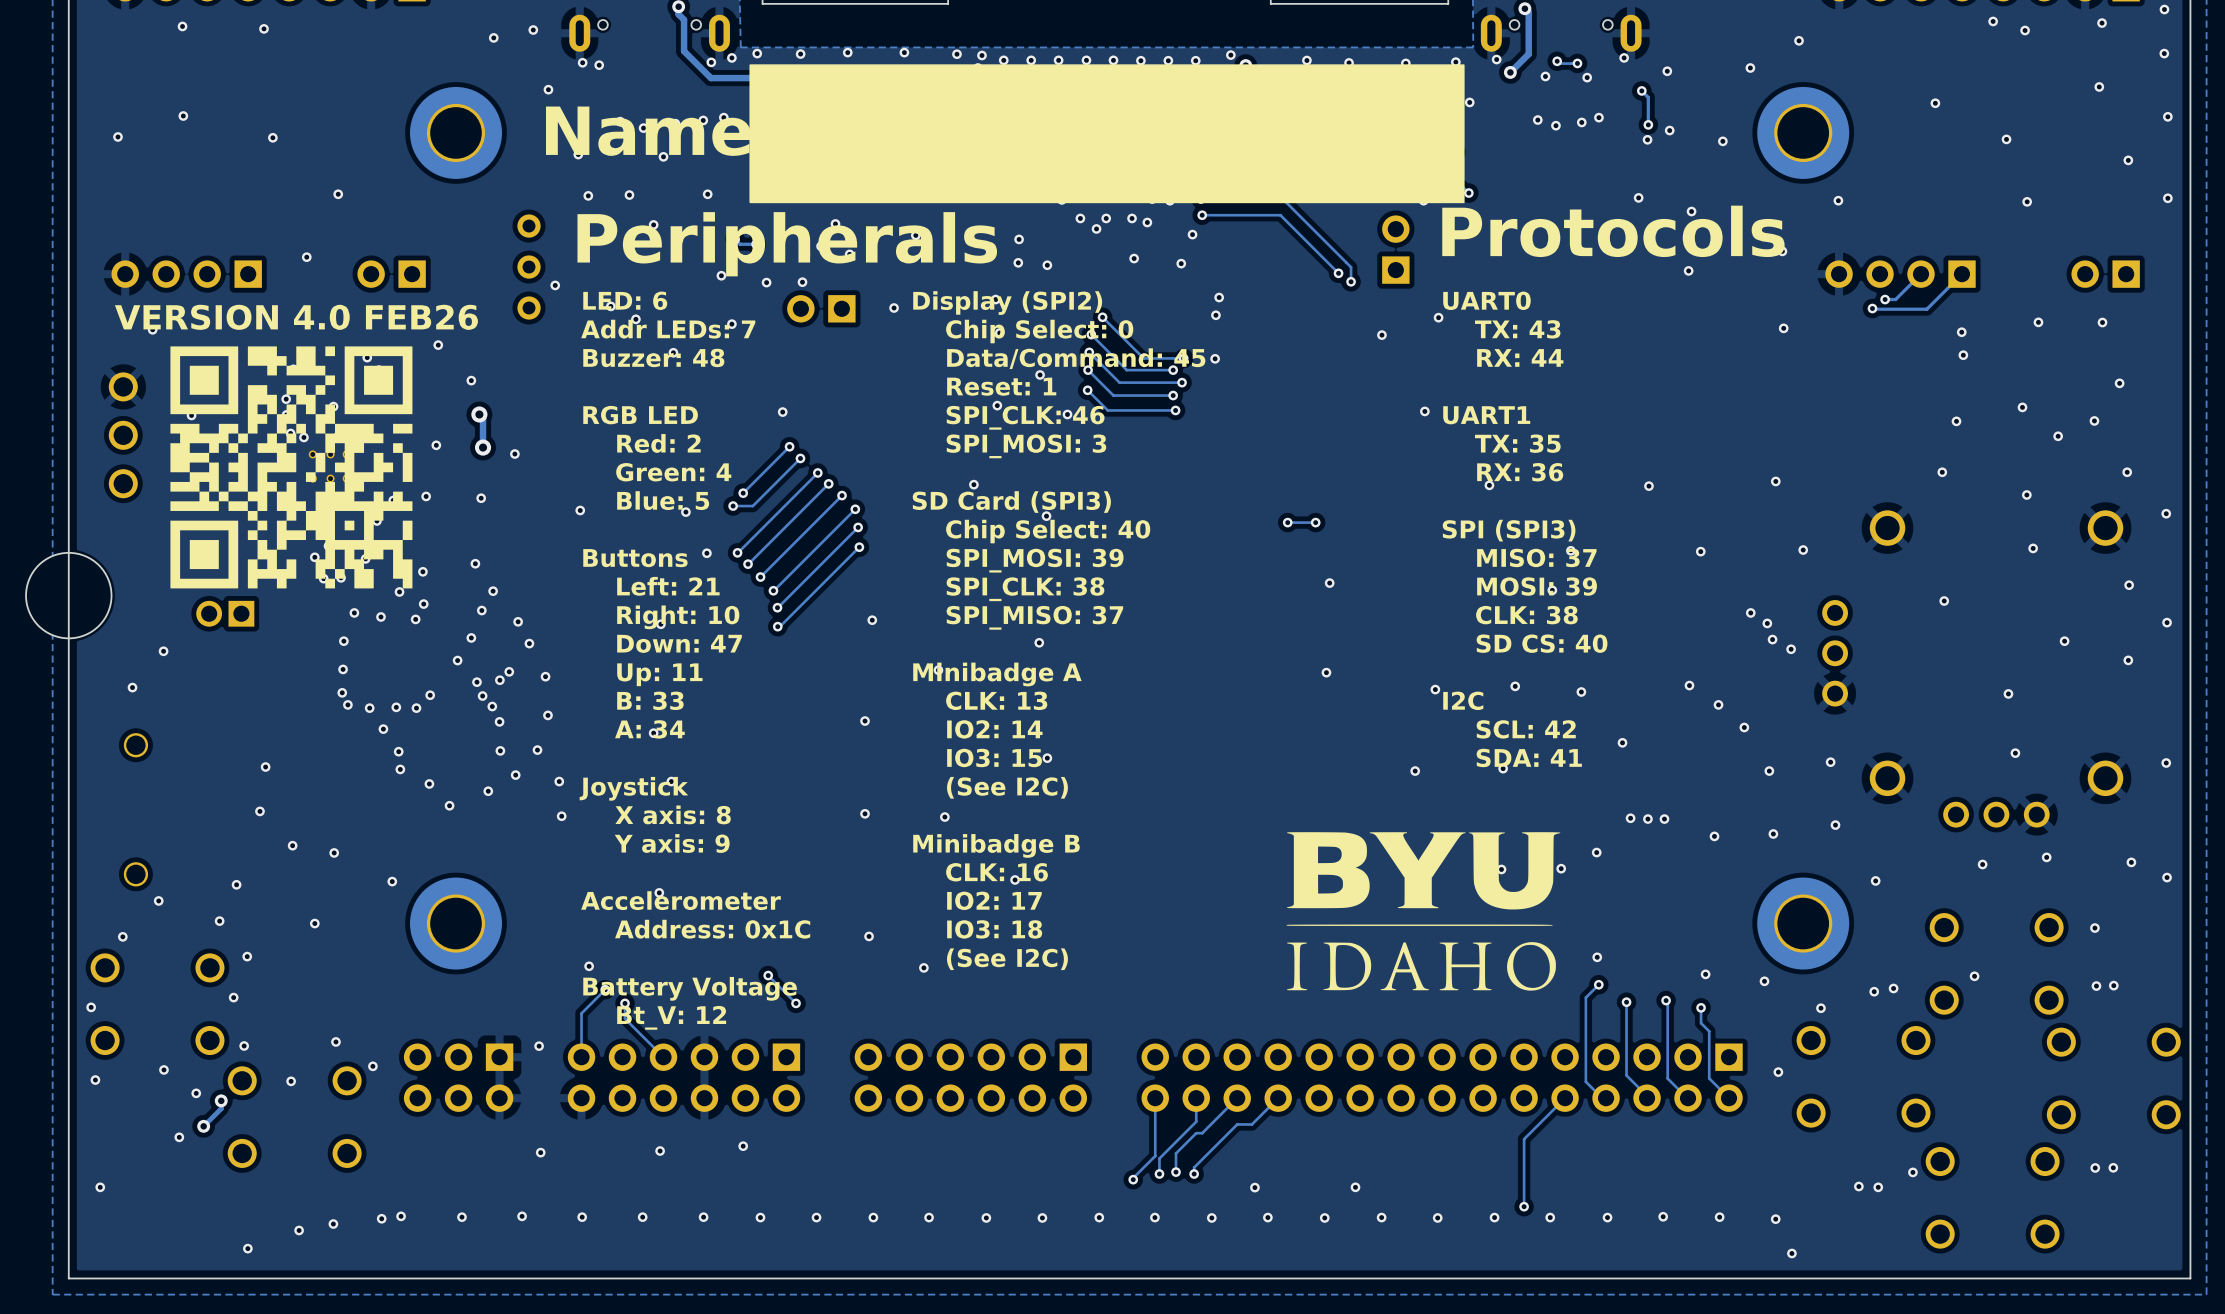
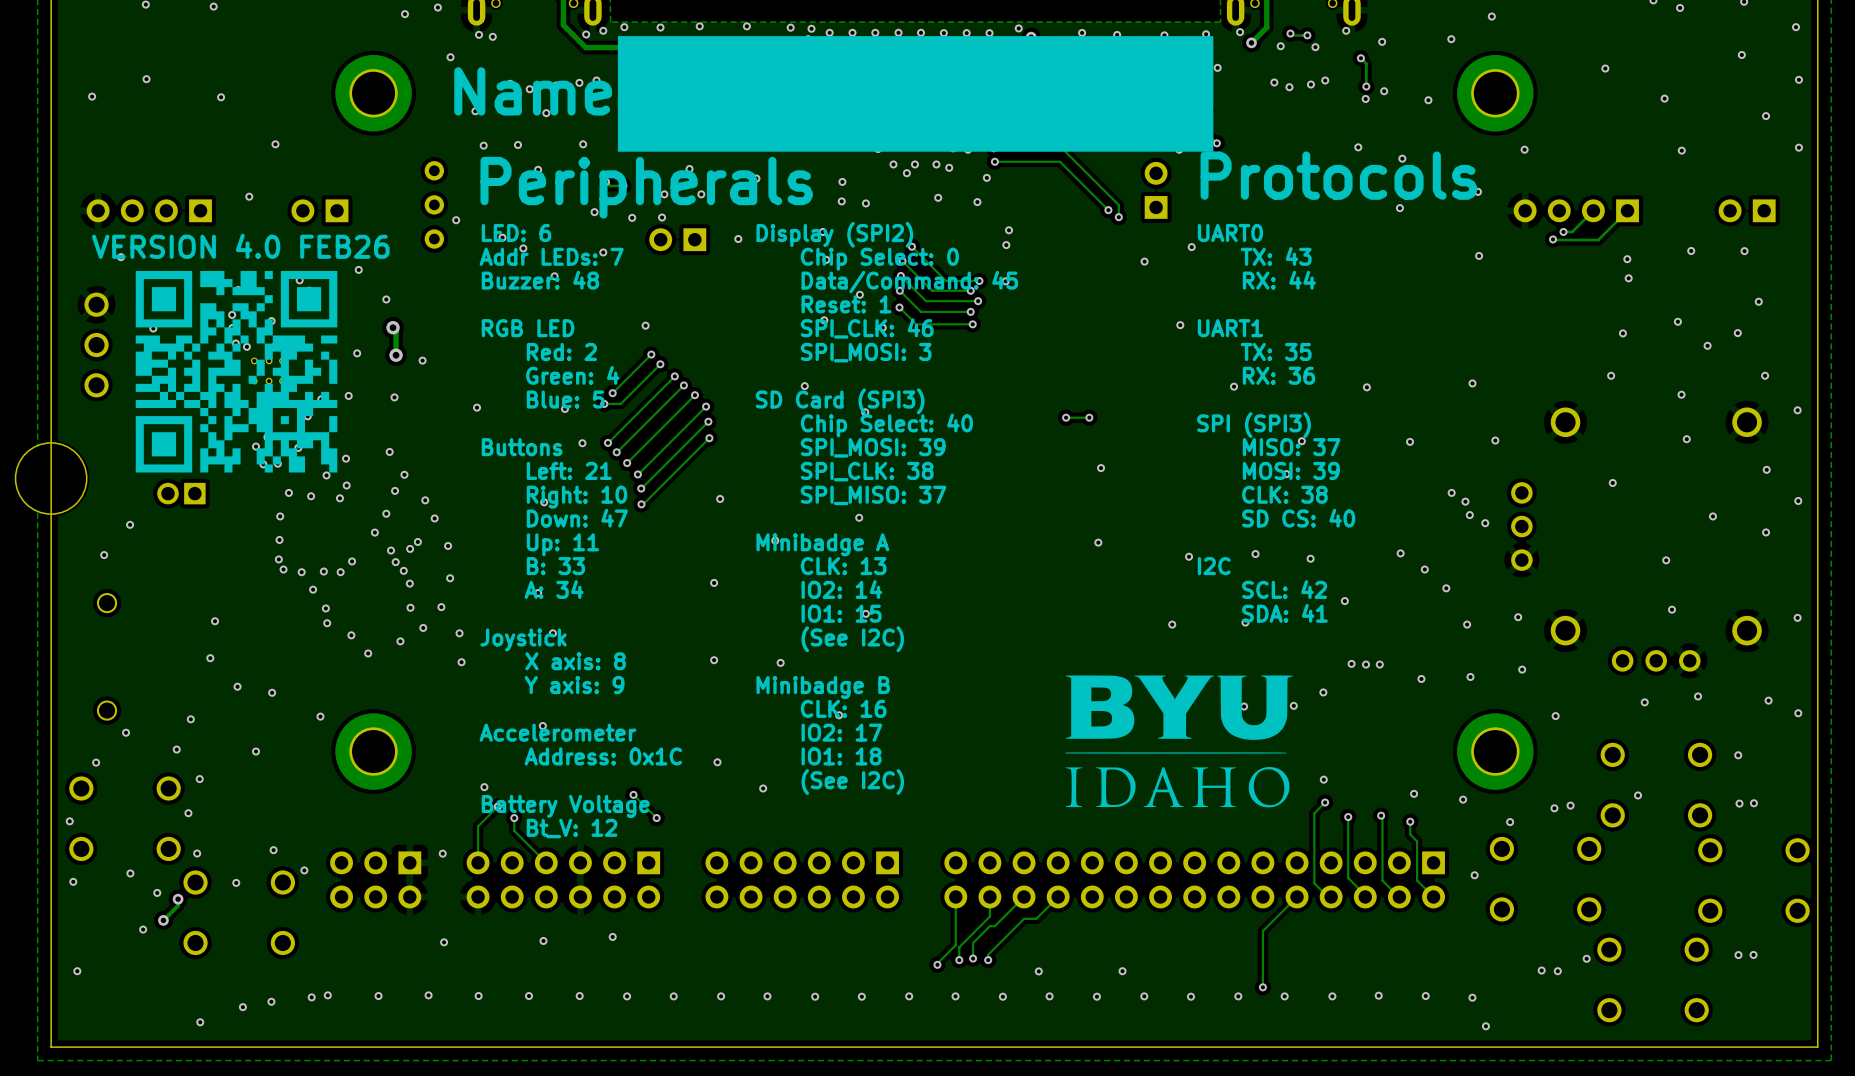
text: IO3: 15 (994, 757) -> IO1: 15 (841, 613)
text: IO3: 18 (994, 929) -> IO1: 18 (841, 756)

